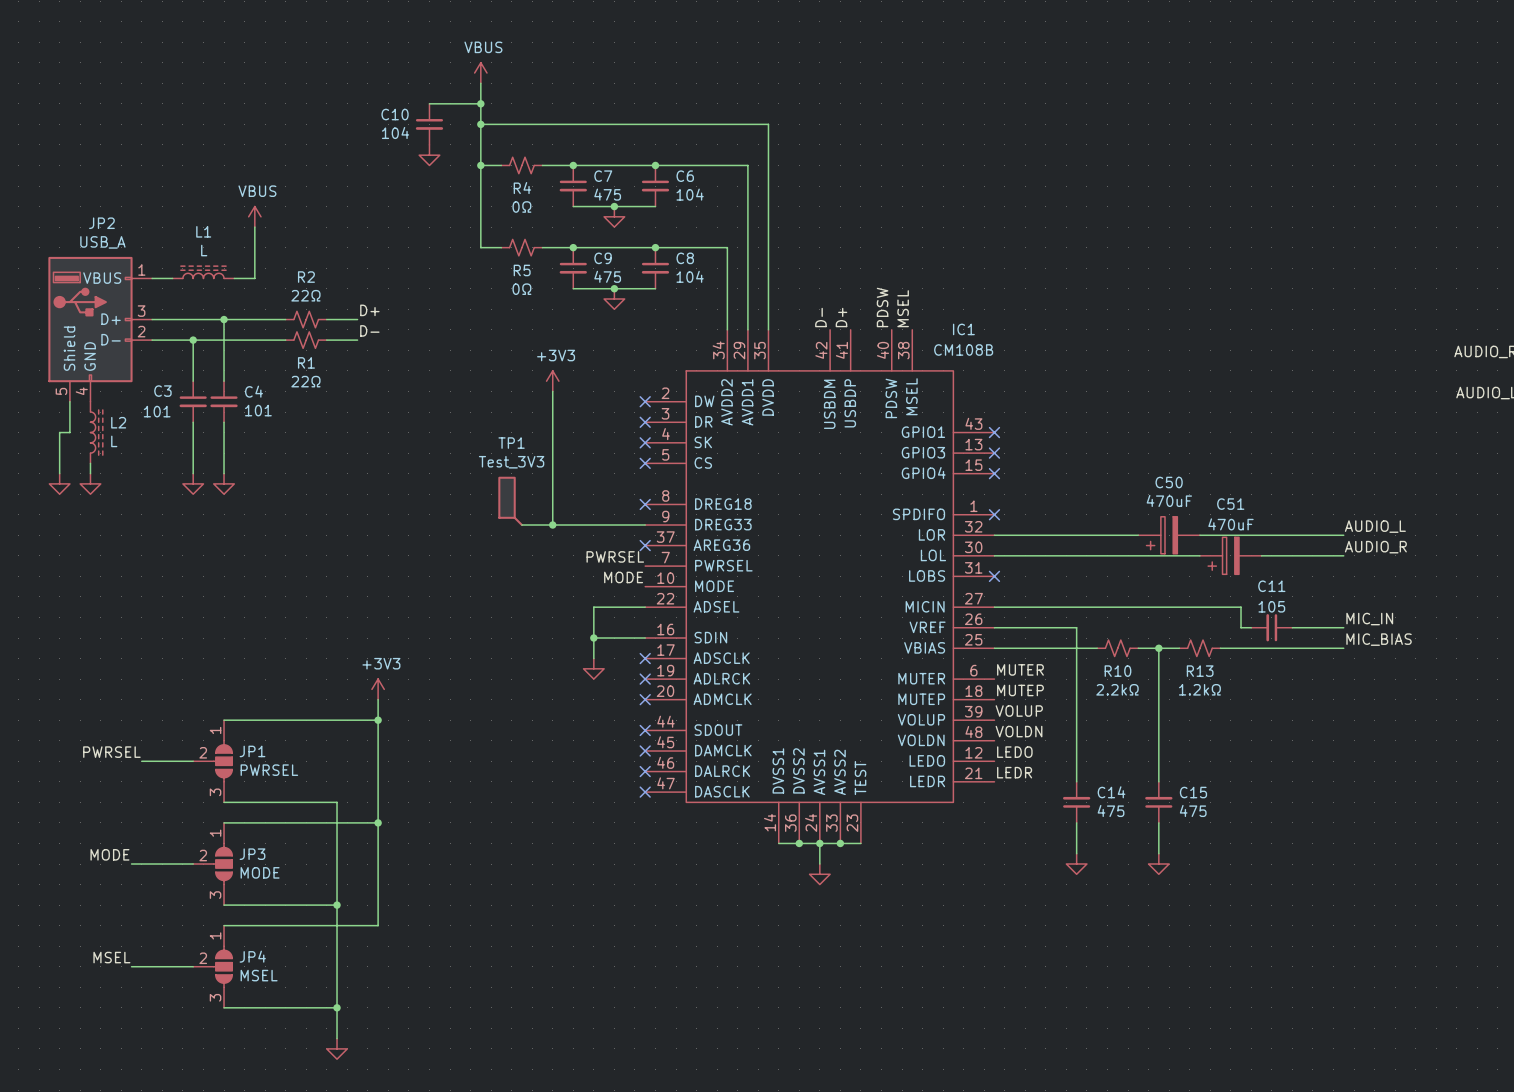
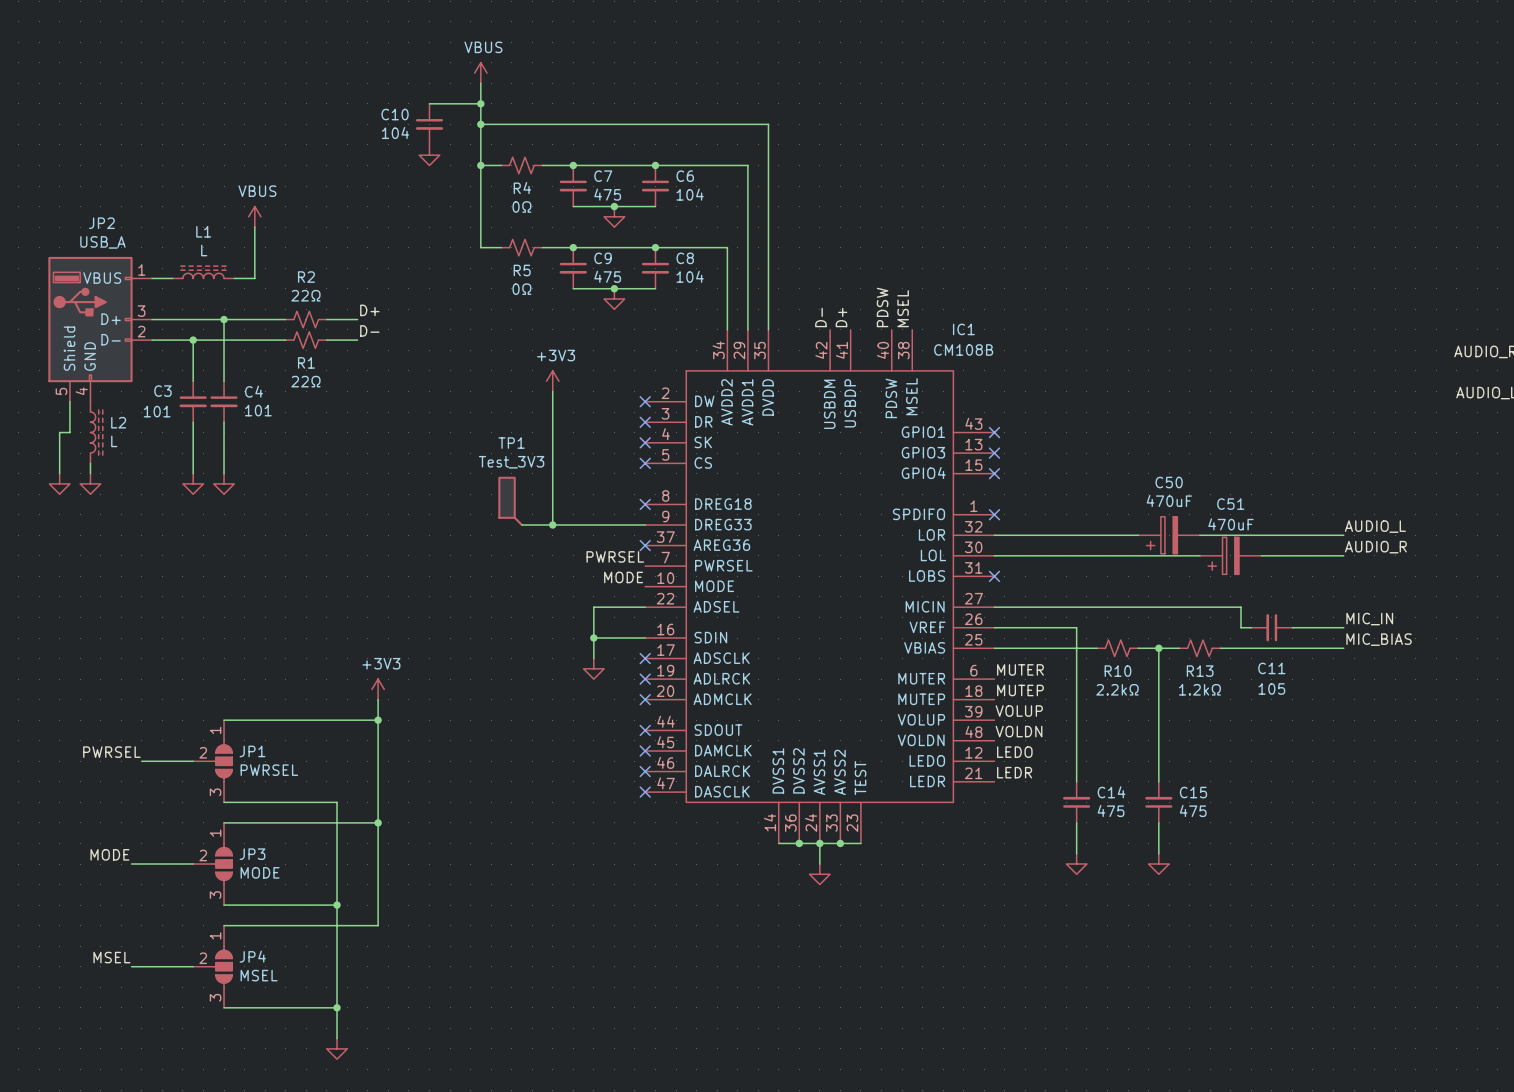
C11 name position: C11 (1271, 586) -> C11 (1271, 668)
C11 value position: 105 (1271, 606) -> 105 (1271, 688)

